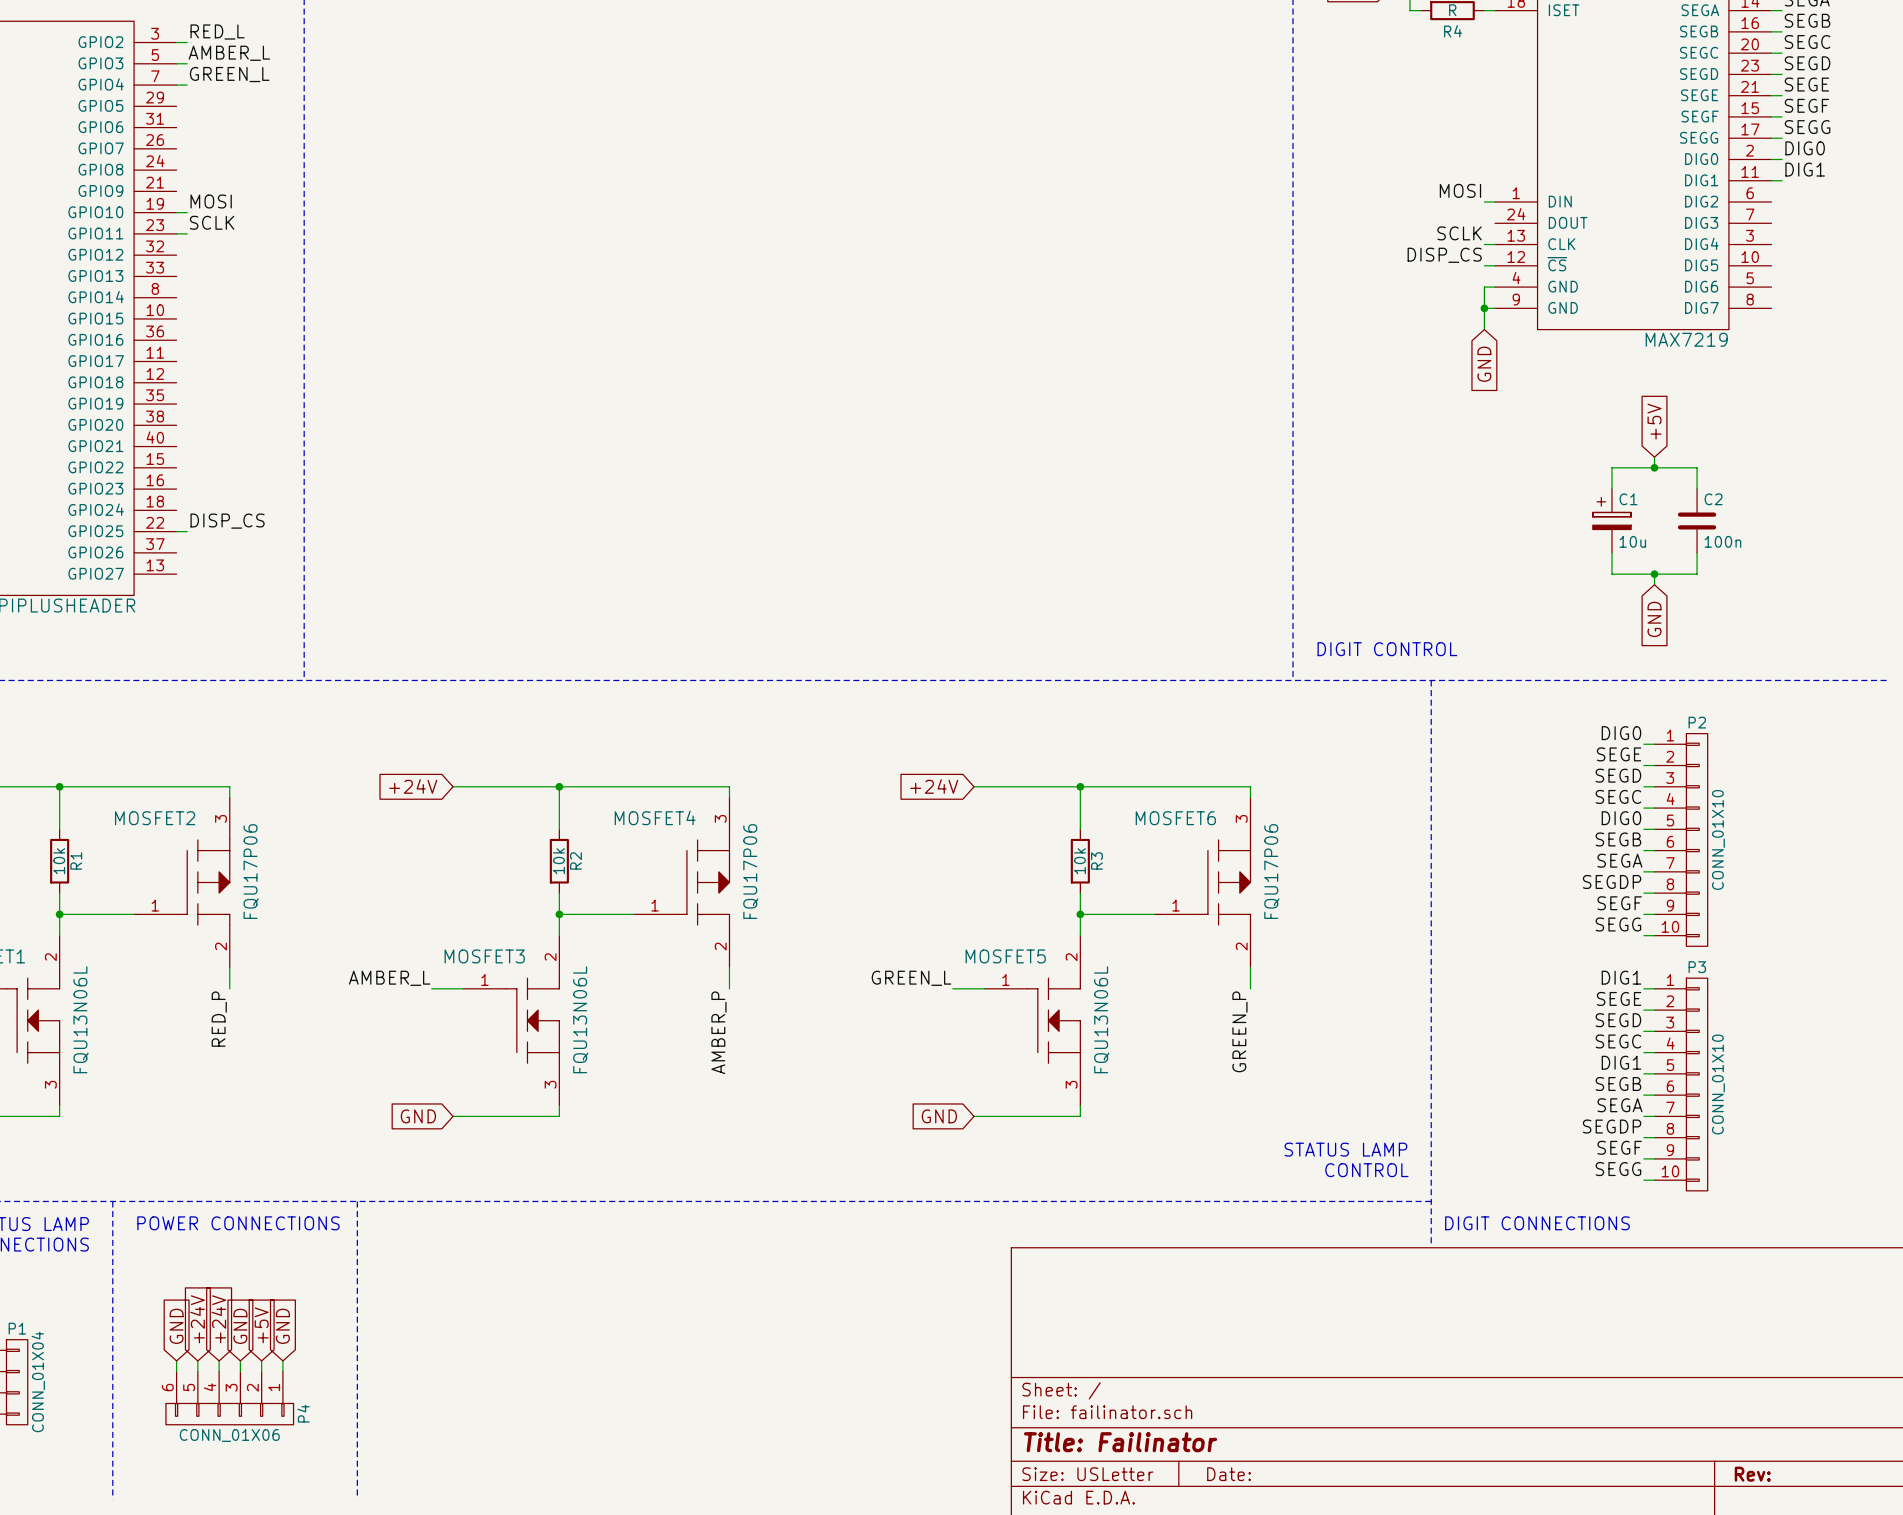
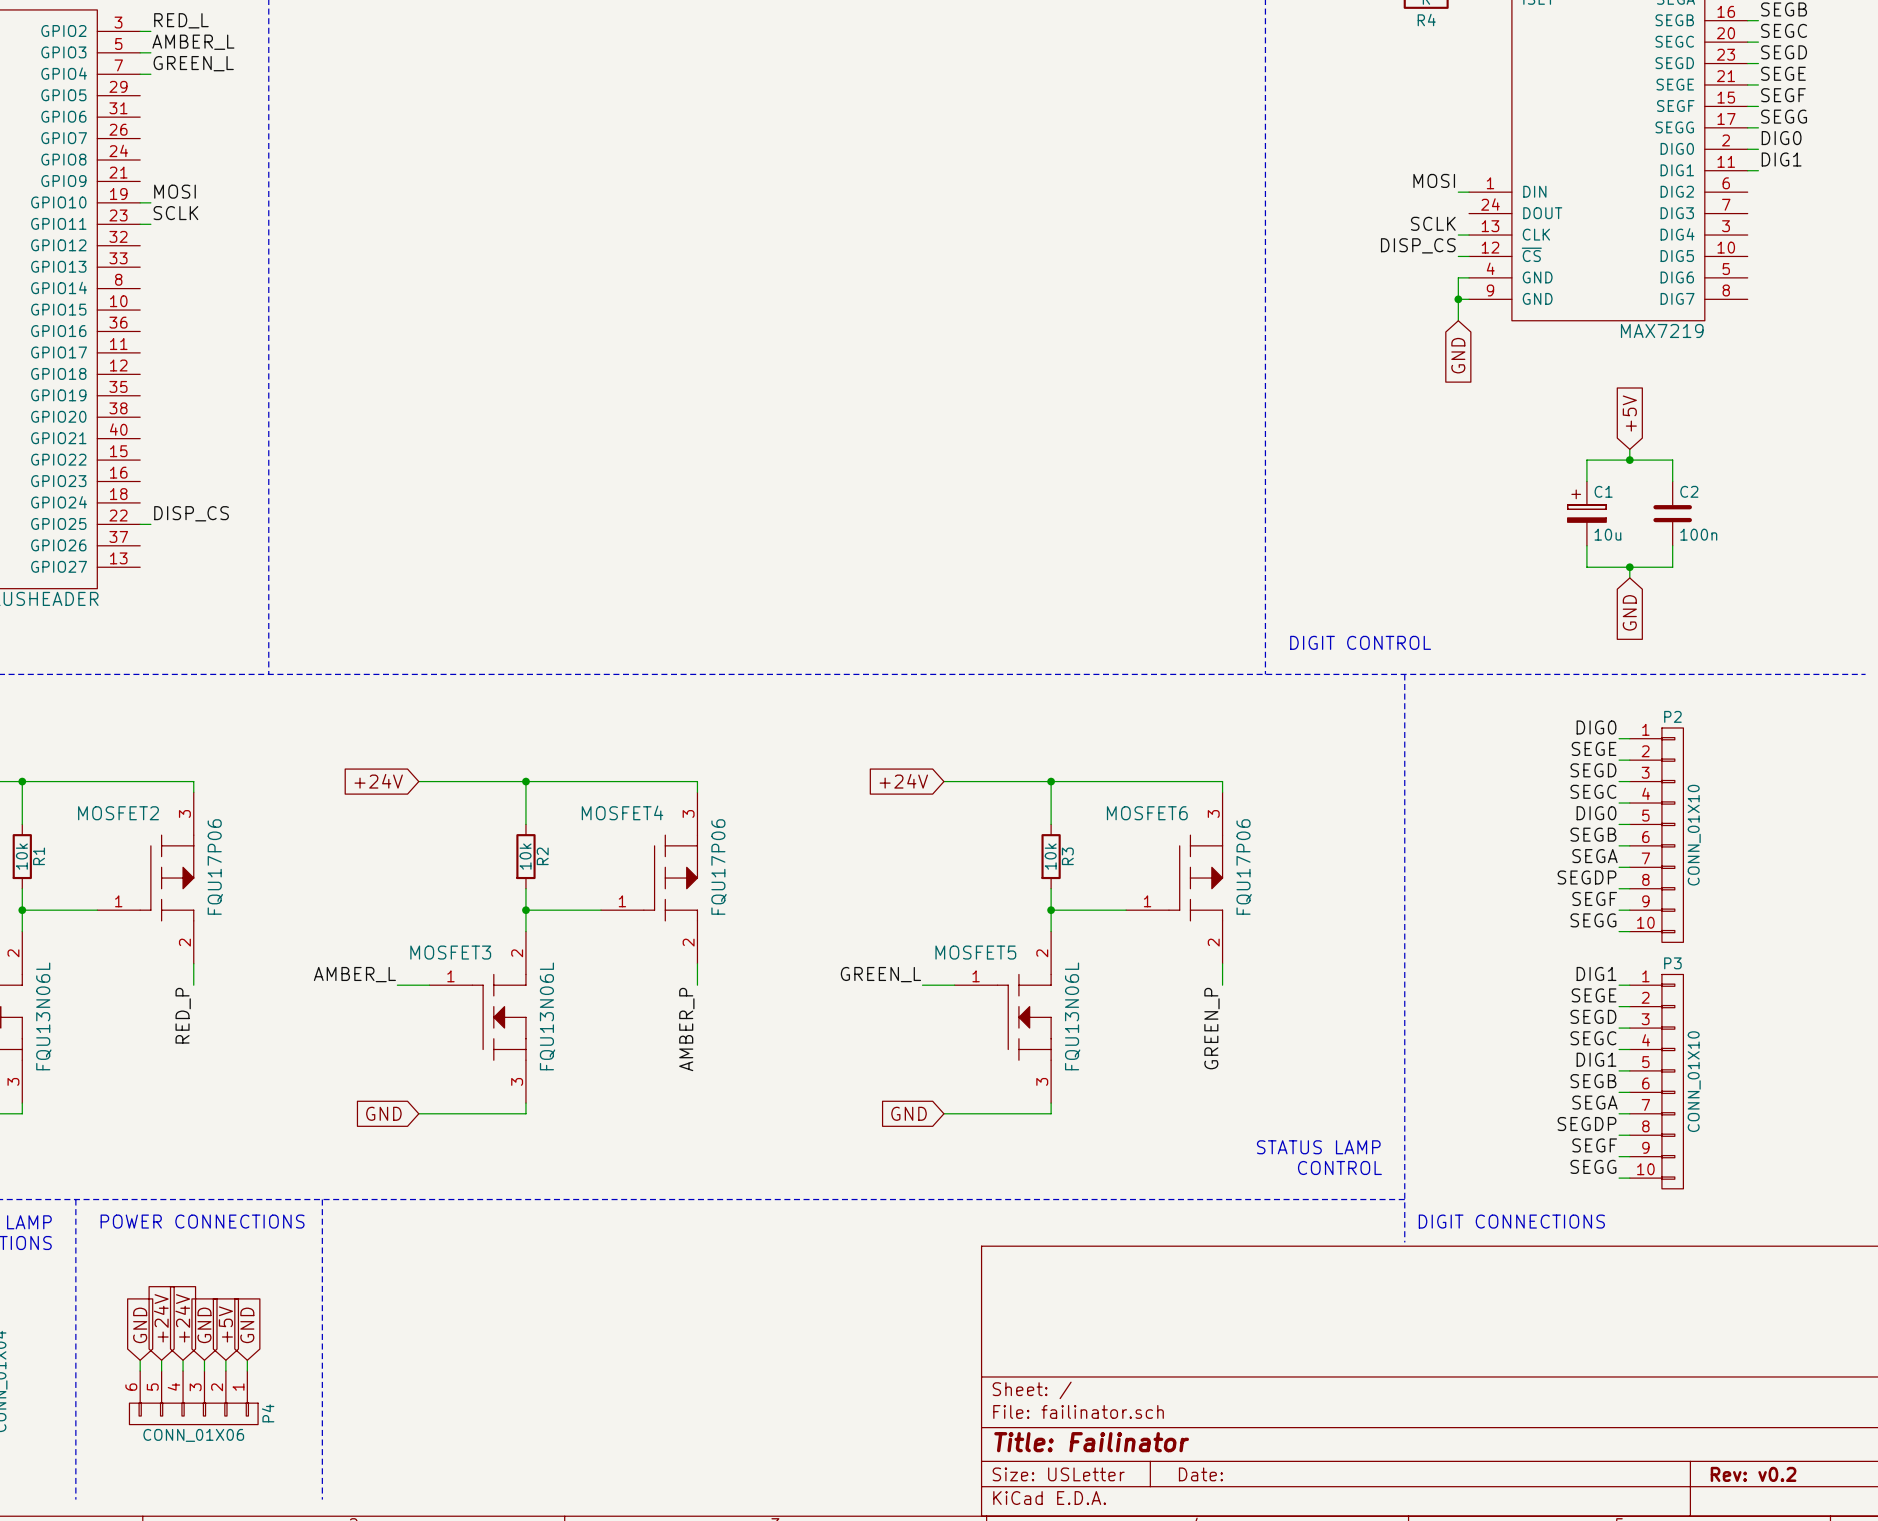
title block: Rev: (1752, 1474) -> Rev: v0.2 (1753, 1474)

